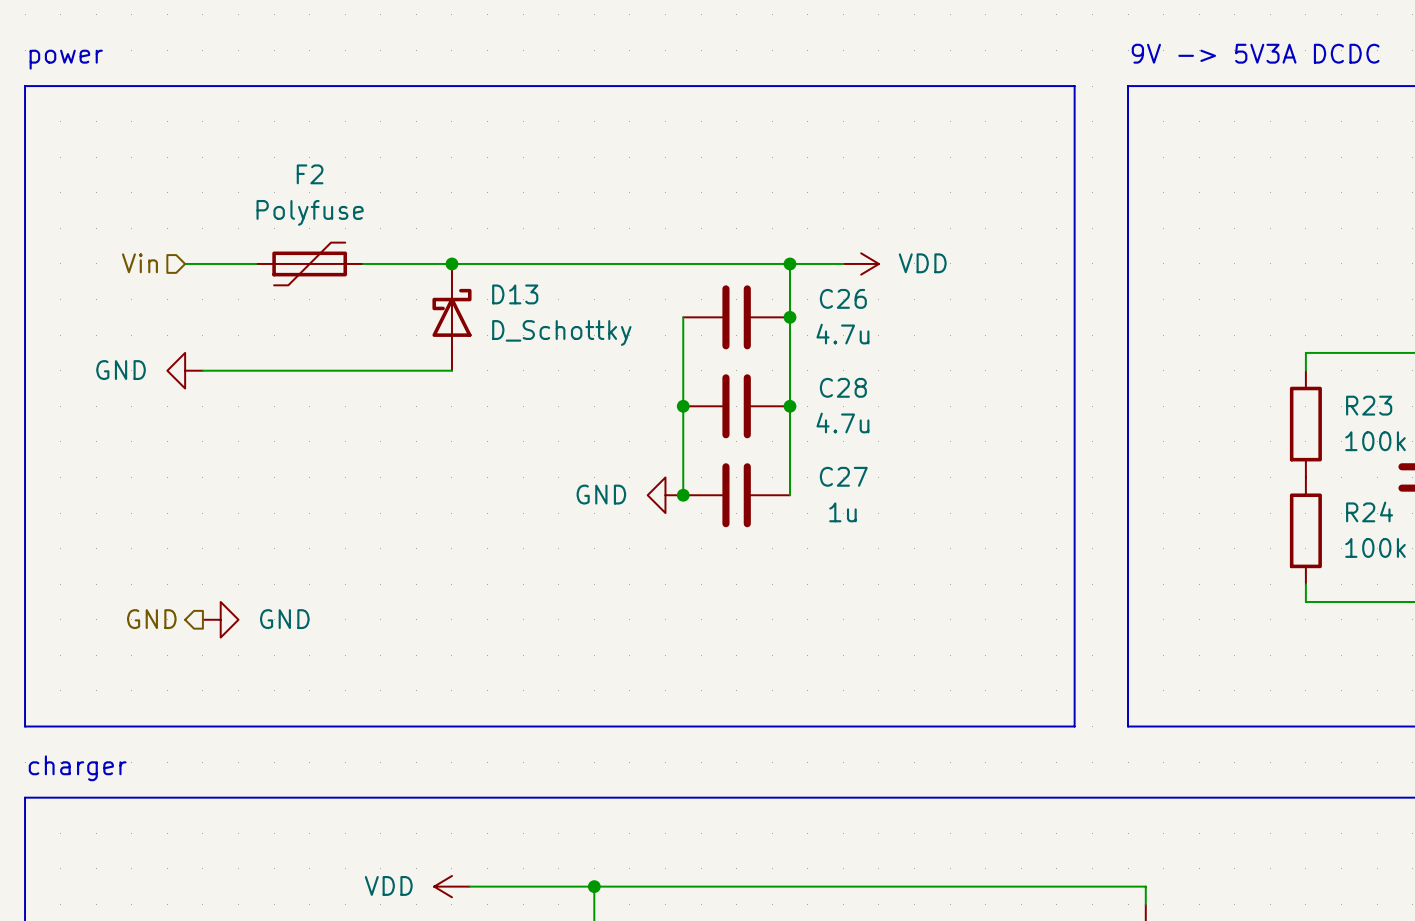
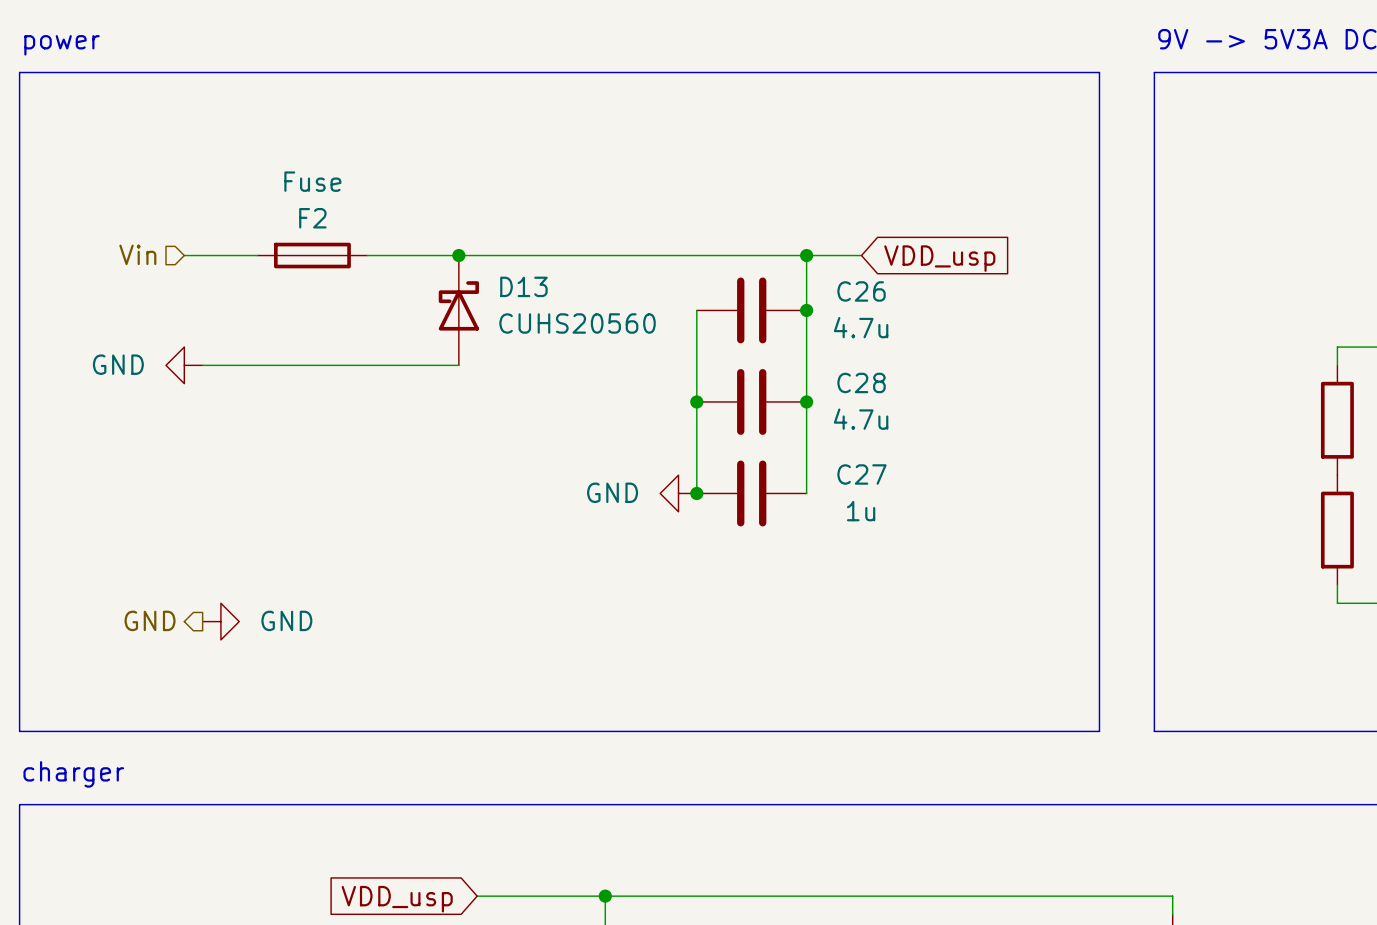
F2 name position: F2 (310, 174) -> F2 (312, 218)
F2 value: Polyfuse (310, 212) -> Fuse (312, 181)
F2 symbol: [256, 242, 364, 286] -> [257, 242, 368, 269]
power symbol: VDD (861, 263) -> none
global label: none -> VDD_usp (939, 258)
D13 value: D_Schottky (561, 332) -> CUHS20560 (577, 323)
power symbol: VDD (451, 886) -> none
global label: none -> VDD_usp (397, 899)

